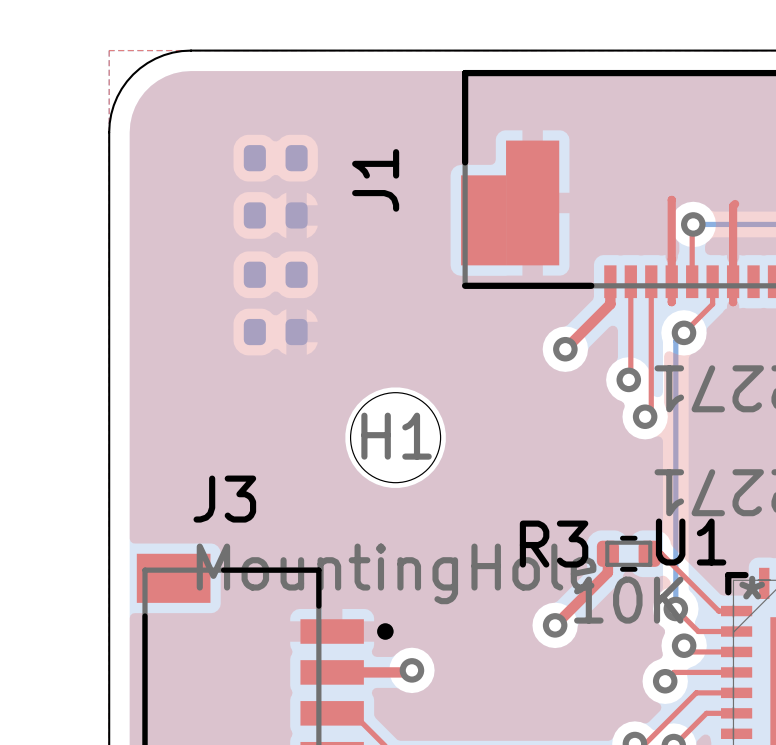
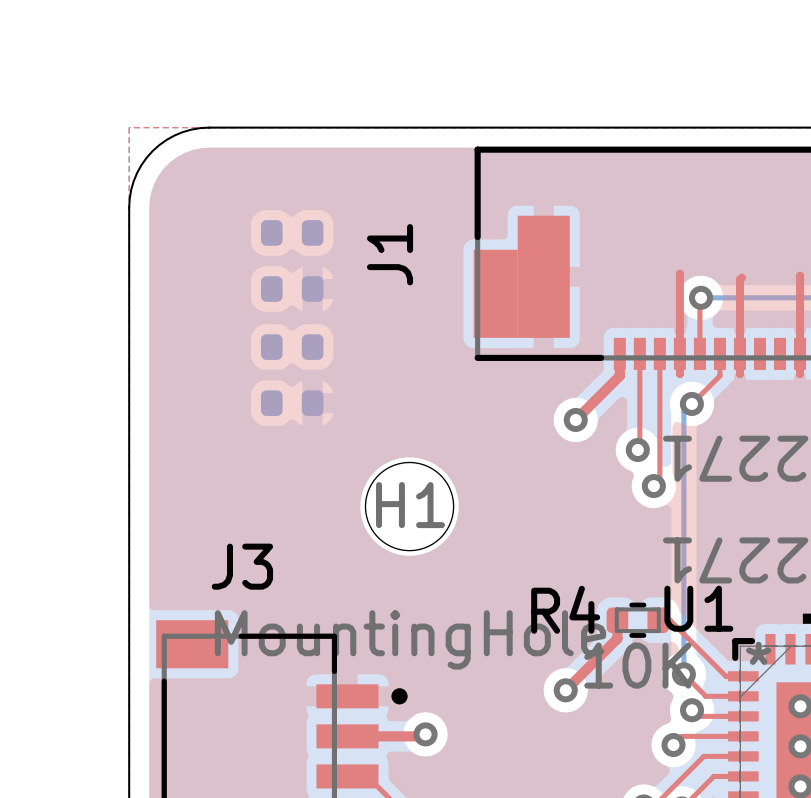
R3 name: R3 (554, 544) -> R4 (565, 609)

